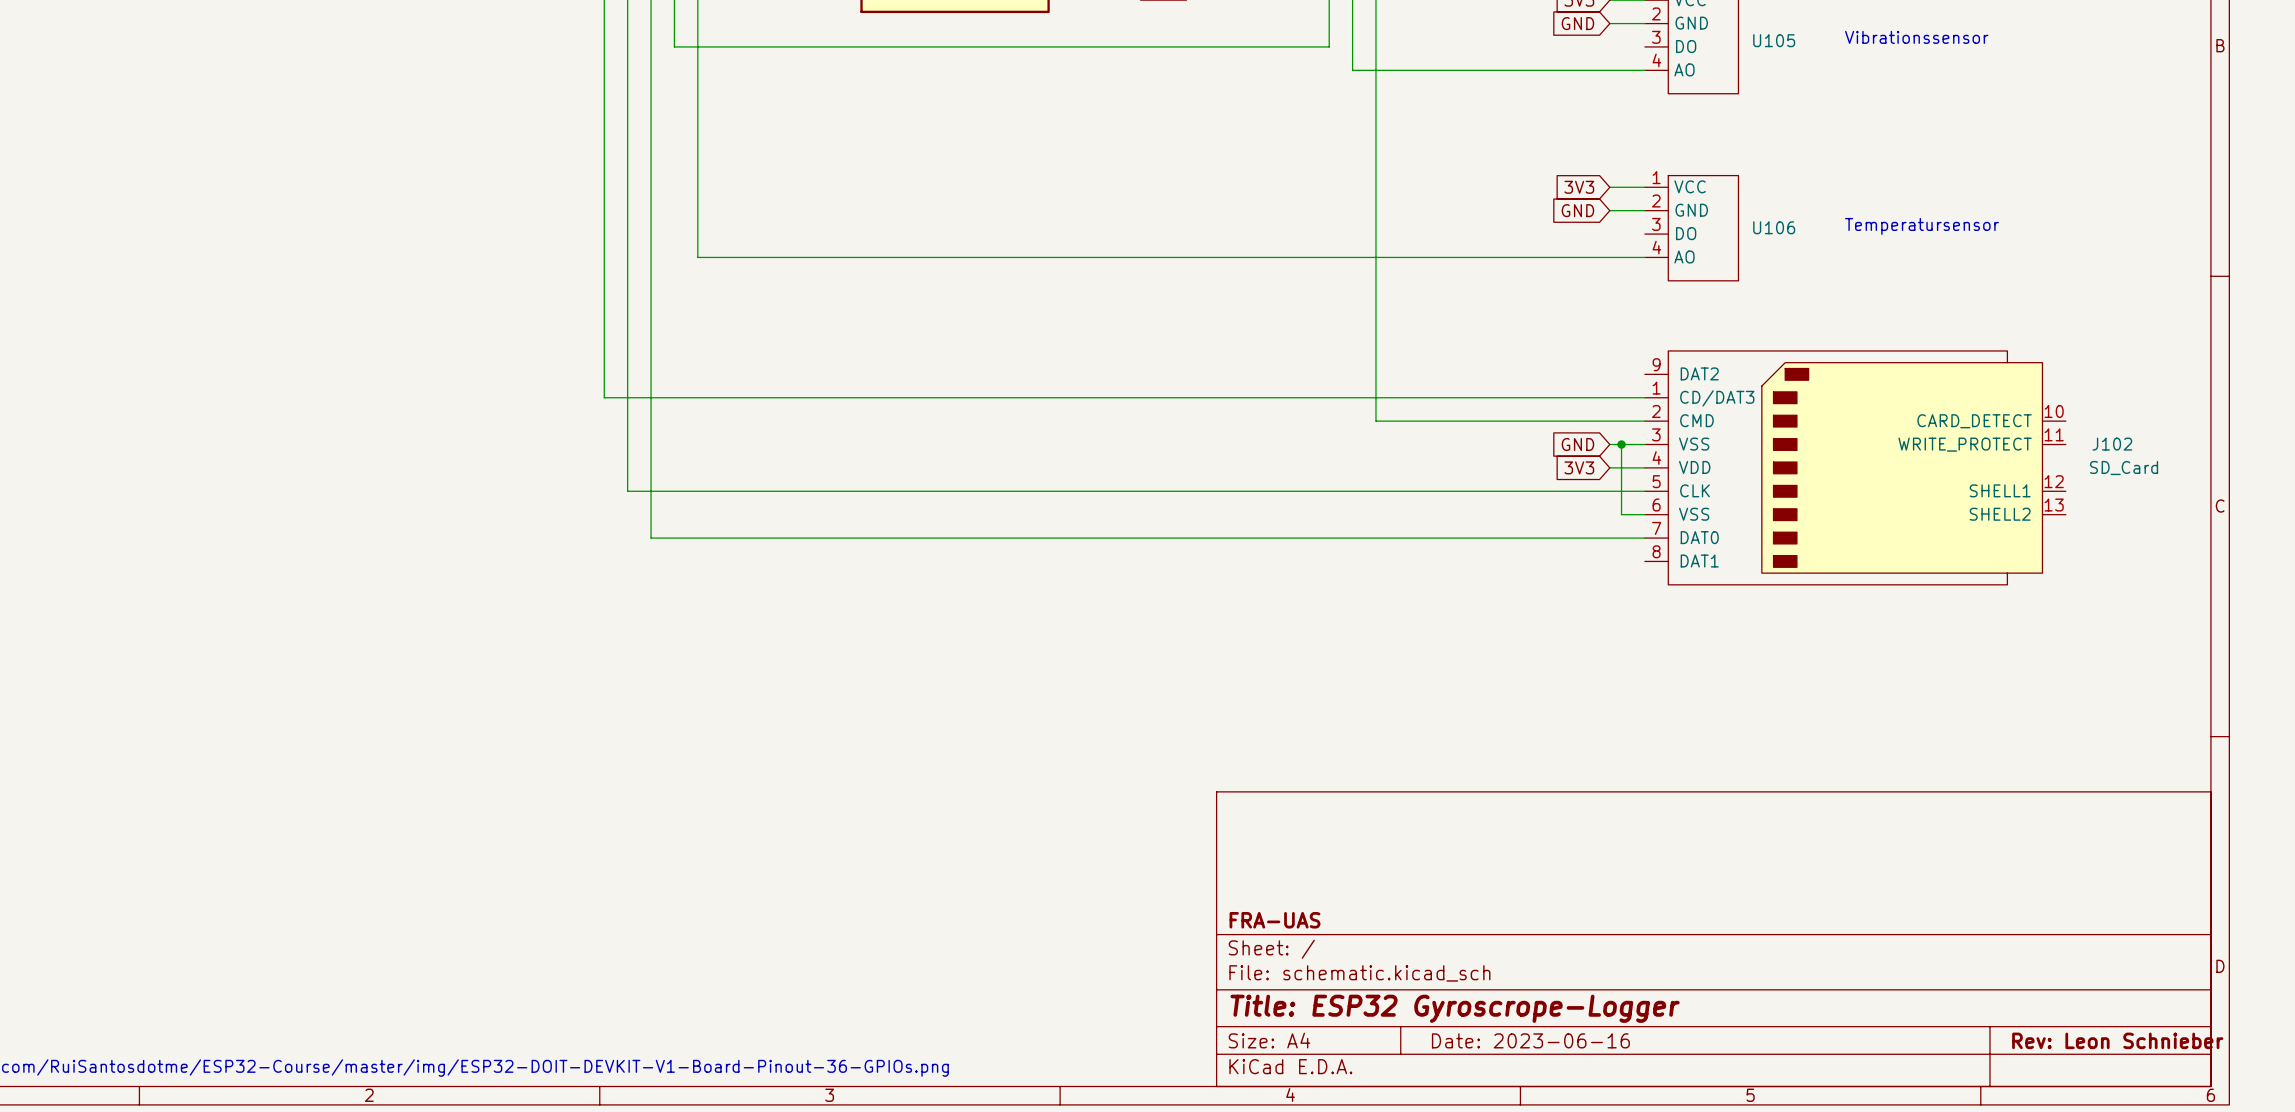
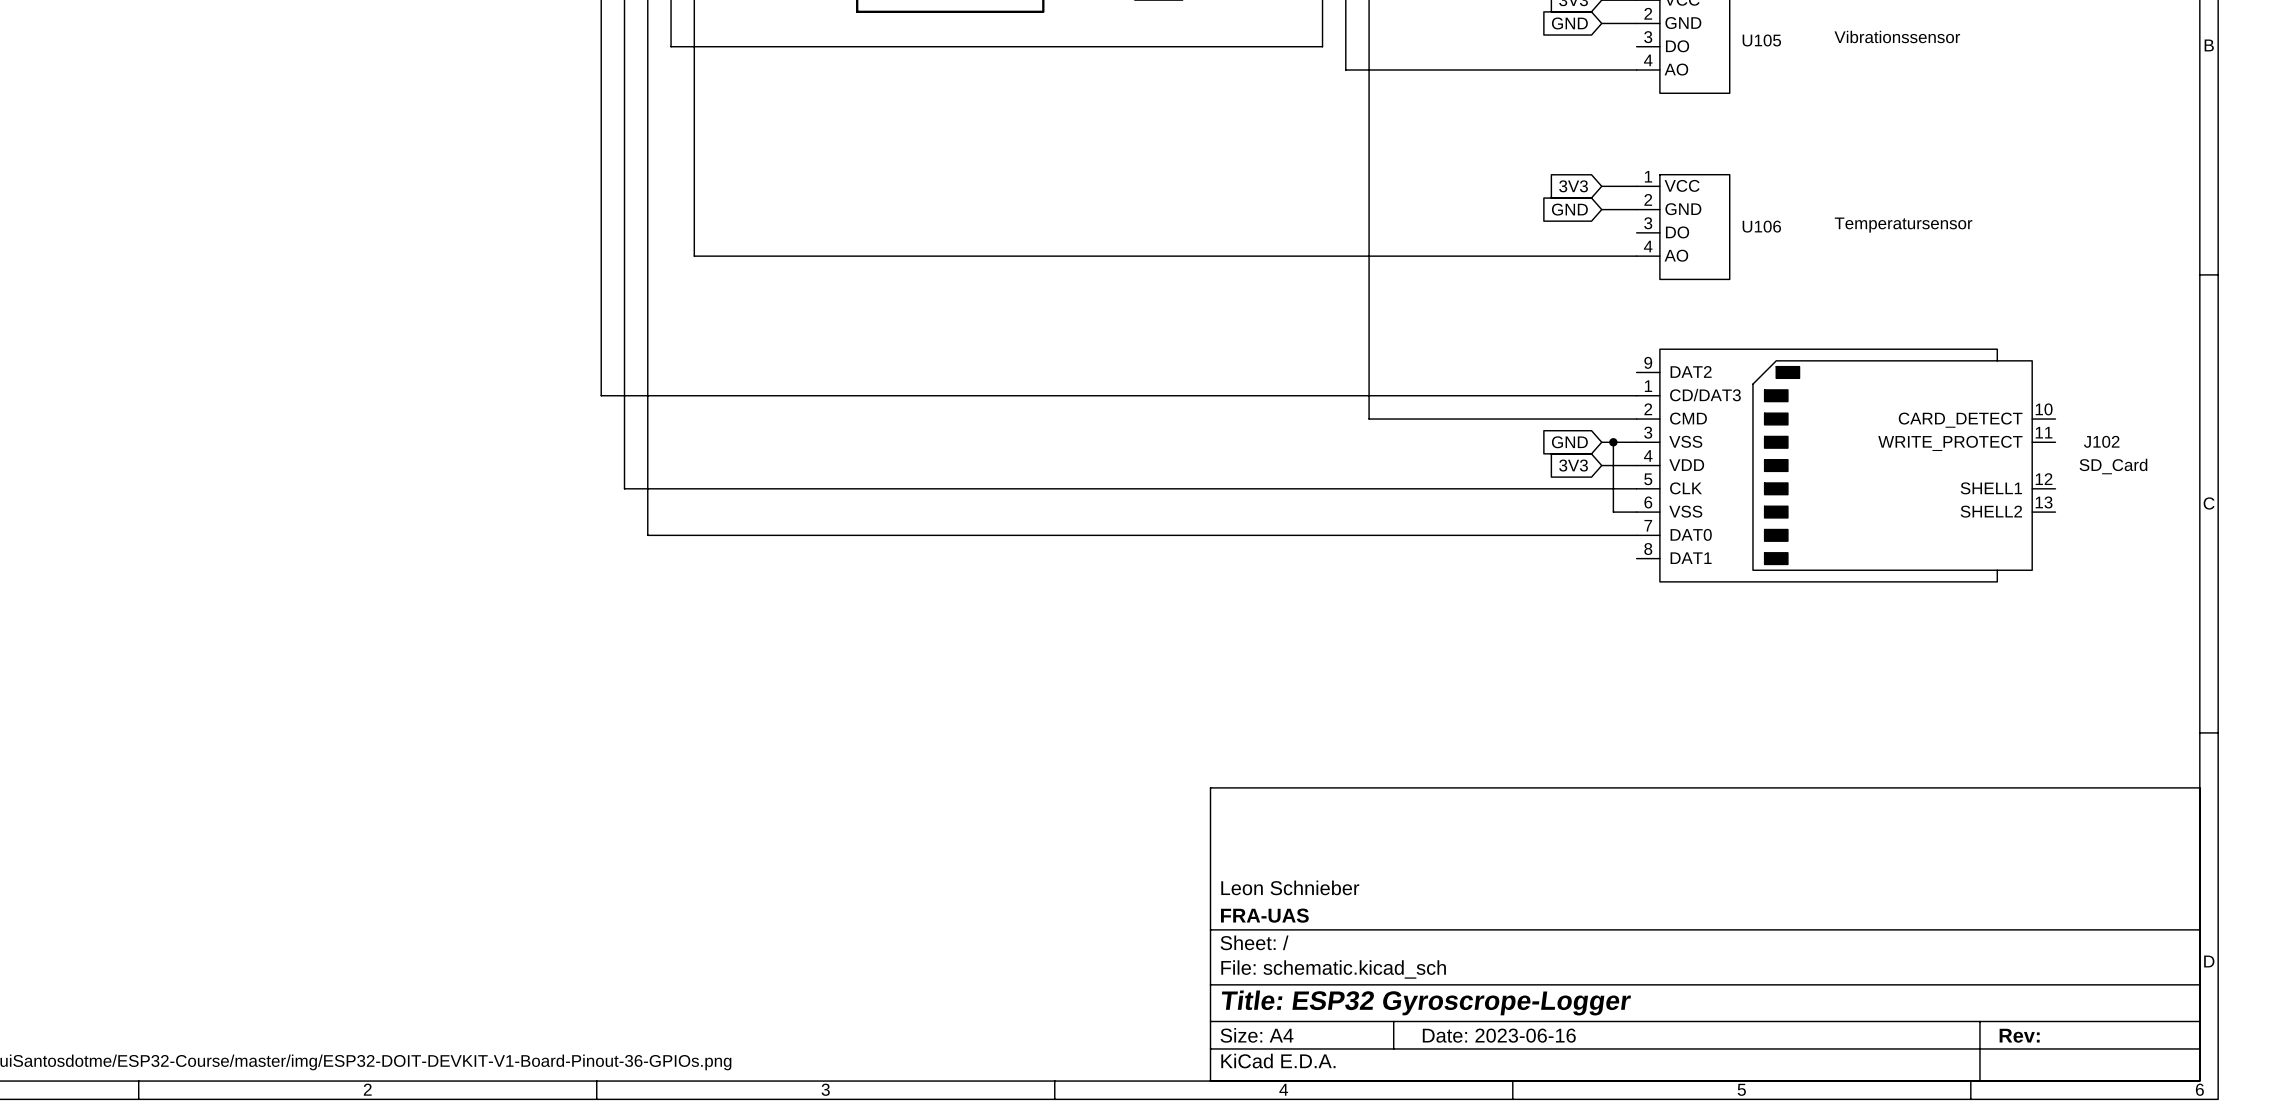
title block: none -> Leon Schnieber (1290, 887)
title block: Rev: Leon Schnieber (2117, 1040) -> Rev: (2019, 1035)

